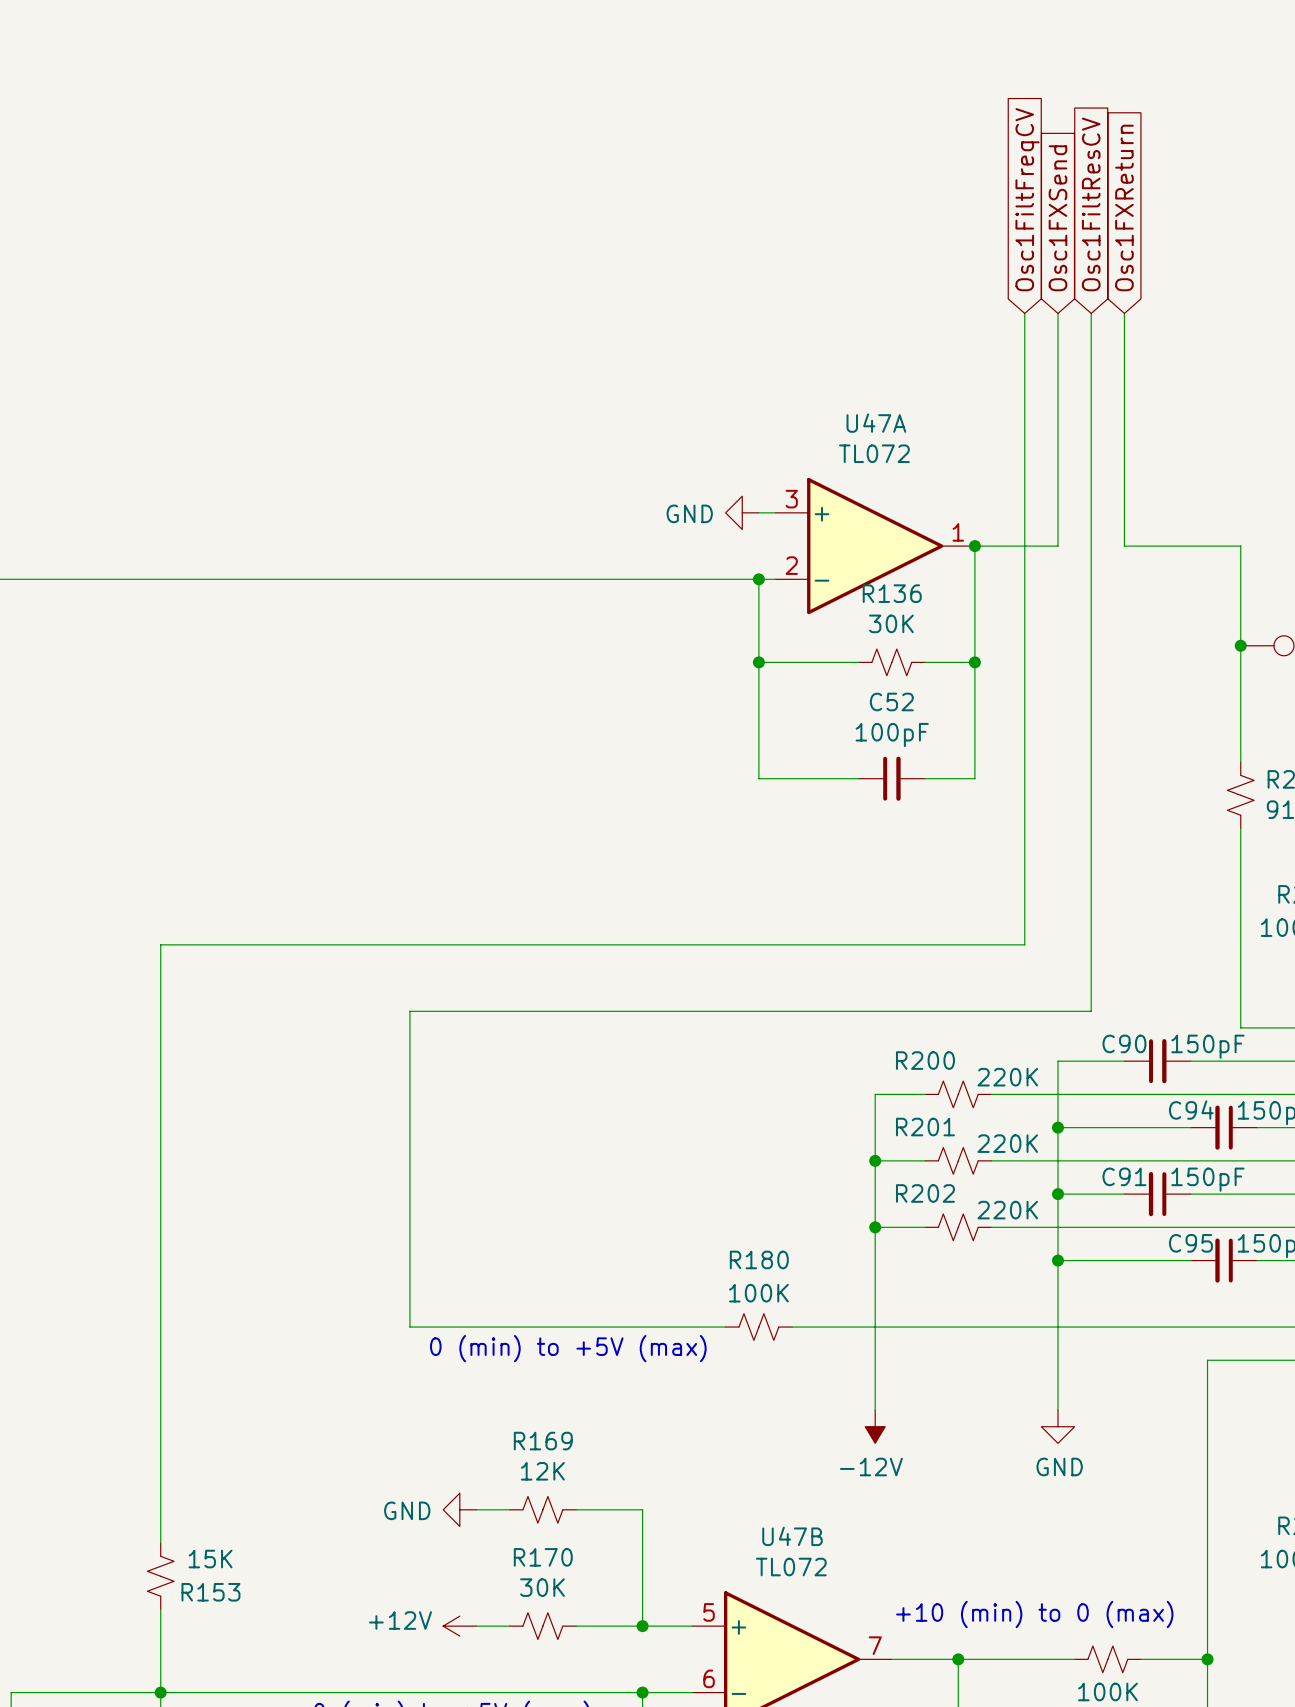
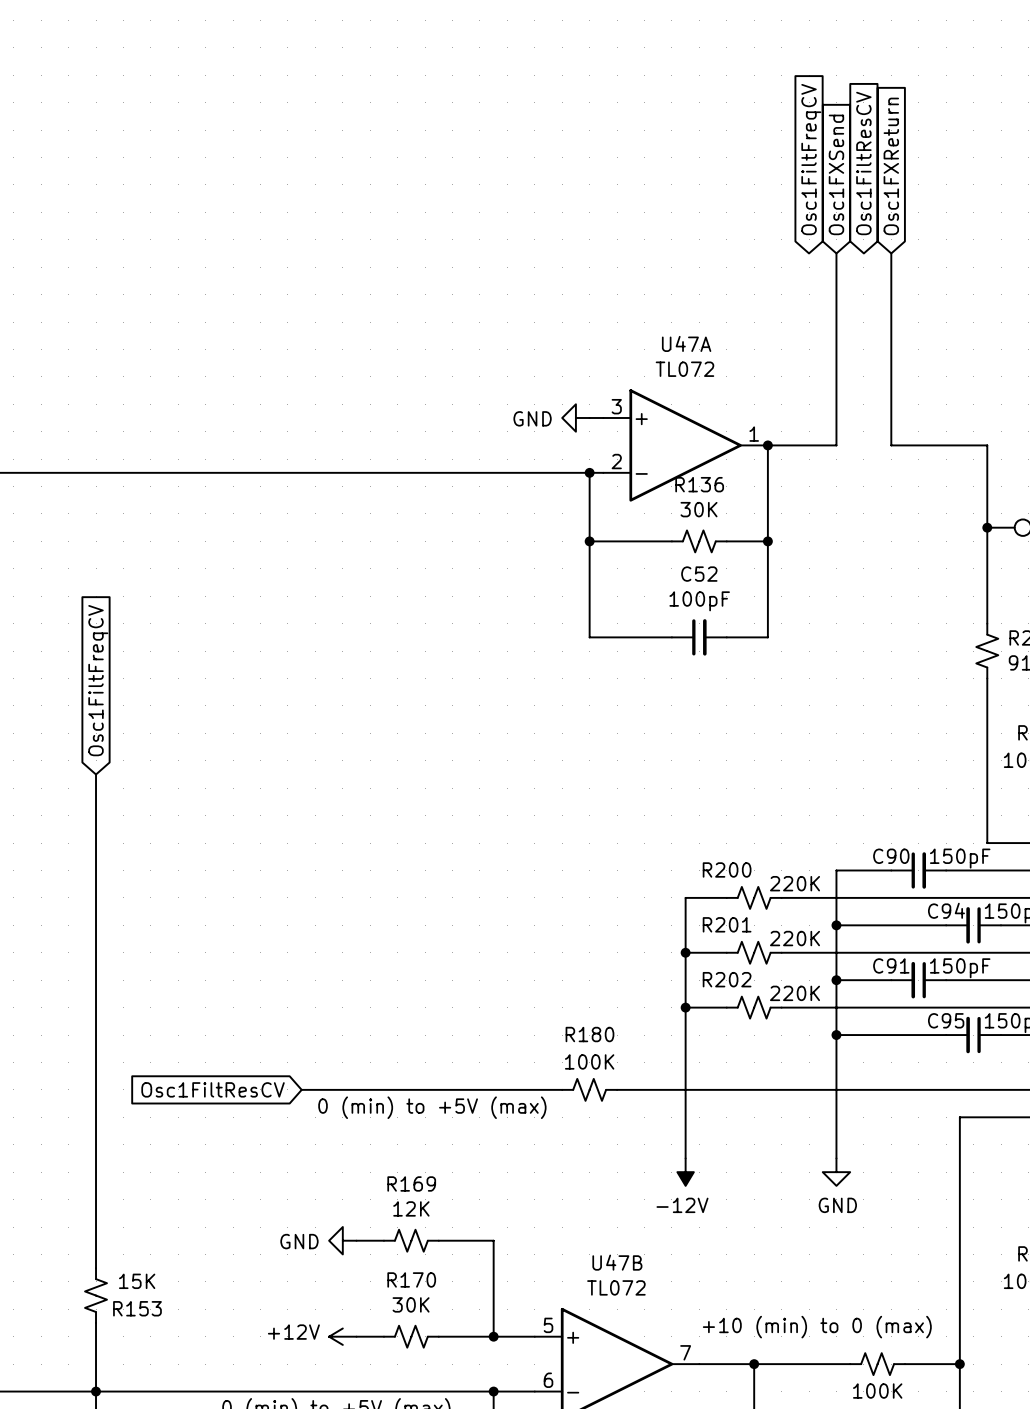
wire: (1024, 313) (1024, 944) (160, 944) -> none
wire: (1091, 313) (1091, 1011) (409, 1011) (409, 1327) -> none
global label: none -> Osc1FiltFreqCV (98, 680)
global label: none -> Osc1FiltResCV (213, 1089)

